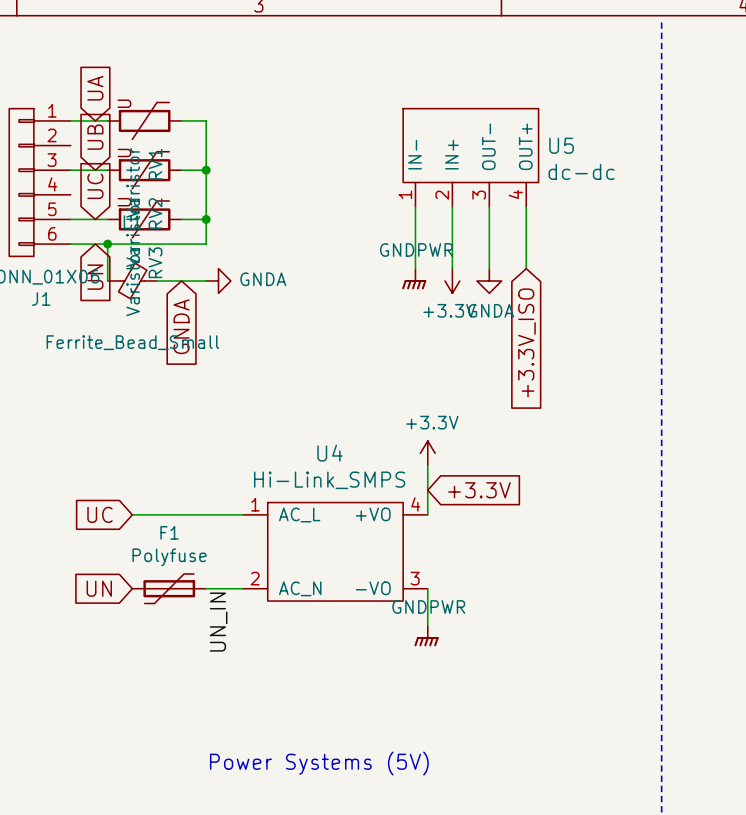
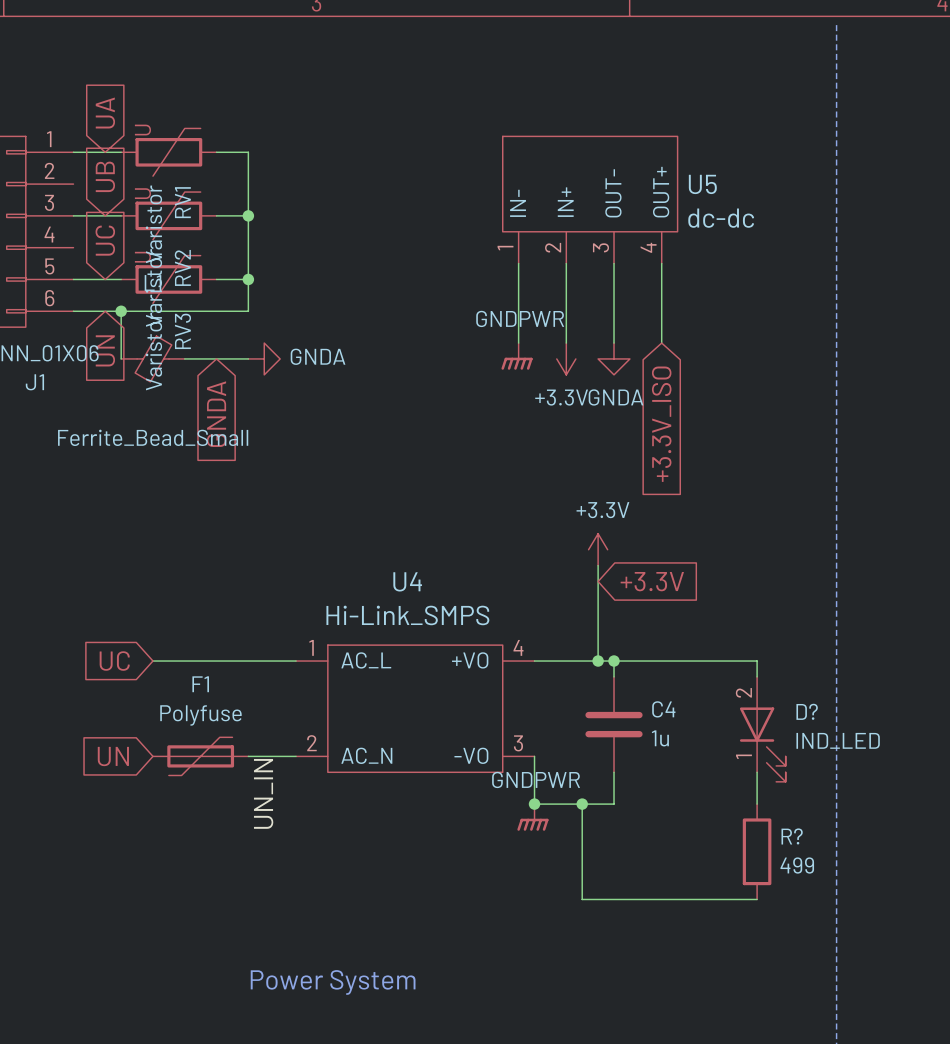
wire: none -> (598, 565) (598, 661)
power symbol position: +3.3V (427, 453) -> +3.3V (598, 549)
wire: (427, 465) (427, 514) -> (757, 676) (757, 661) (534, 661)
global label position: +3.3V (479, 490) -> +3.3V (652, 581)
junction: none -> (598, 661)
wire: none -> (614, 661) (614, 676)
junction: none -> (614, 661)
C4: none -> 1u (614, 724)
D?: none -> IND_LED (762, 729)
wire: none -> (614, 772) (614, 804) (534, 804)
wire: none -> (757, 772) (757, 804)
junction: none -> (534, 804)
wire: none -> (582, 804) (582, 899) (757, 899)
junction: none -> (582, 804)
R?: none -> 499 (757, 851)
text: Power Systems (5V) (319, 763) -> Power System (333, 982)

